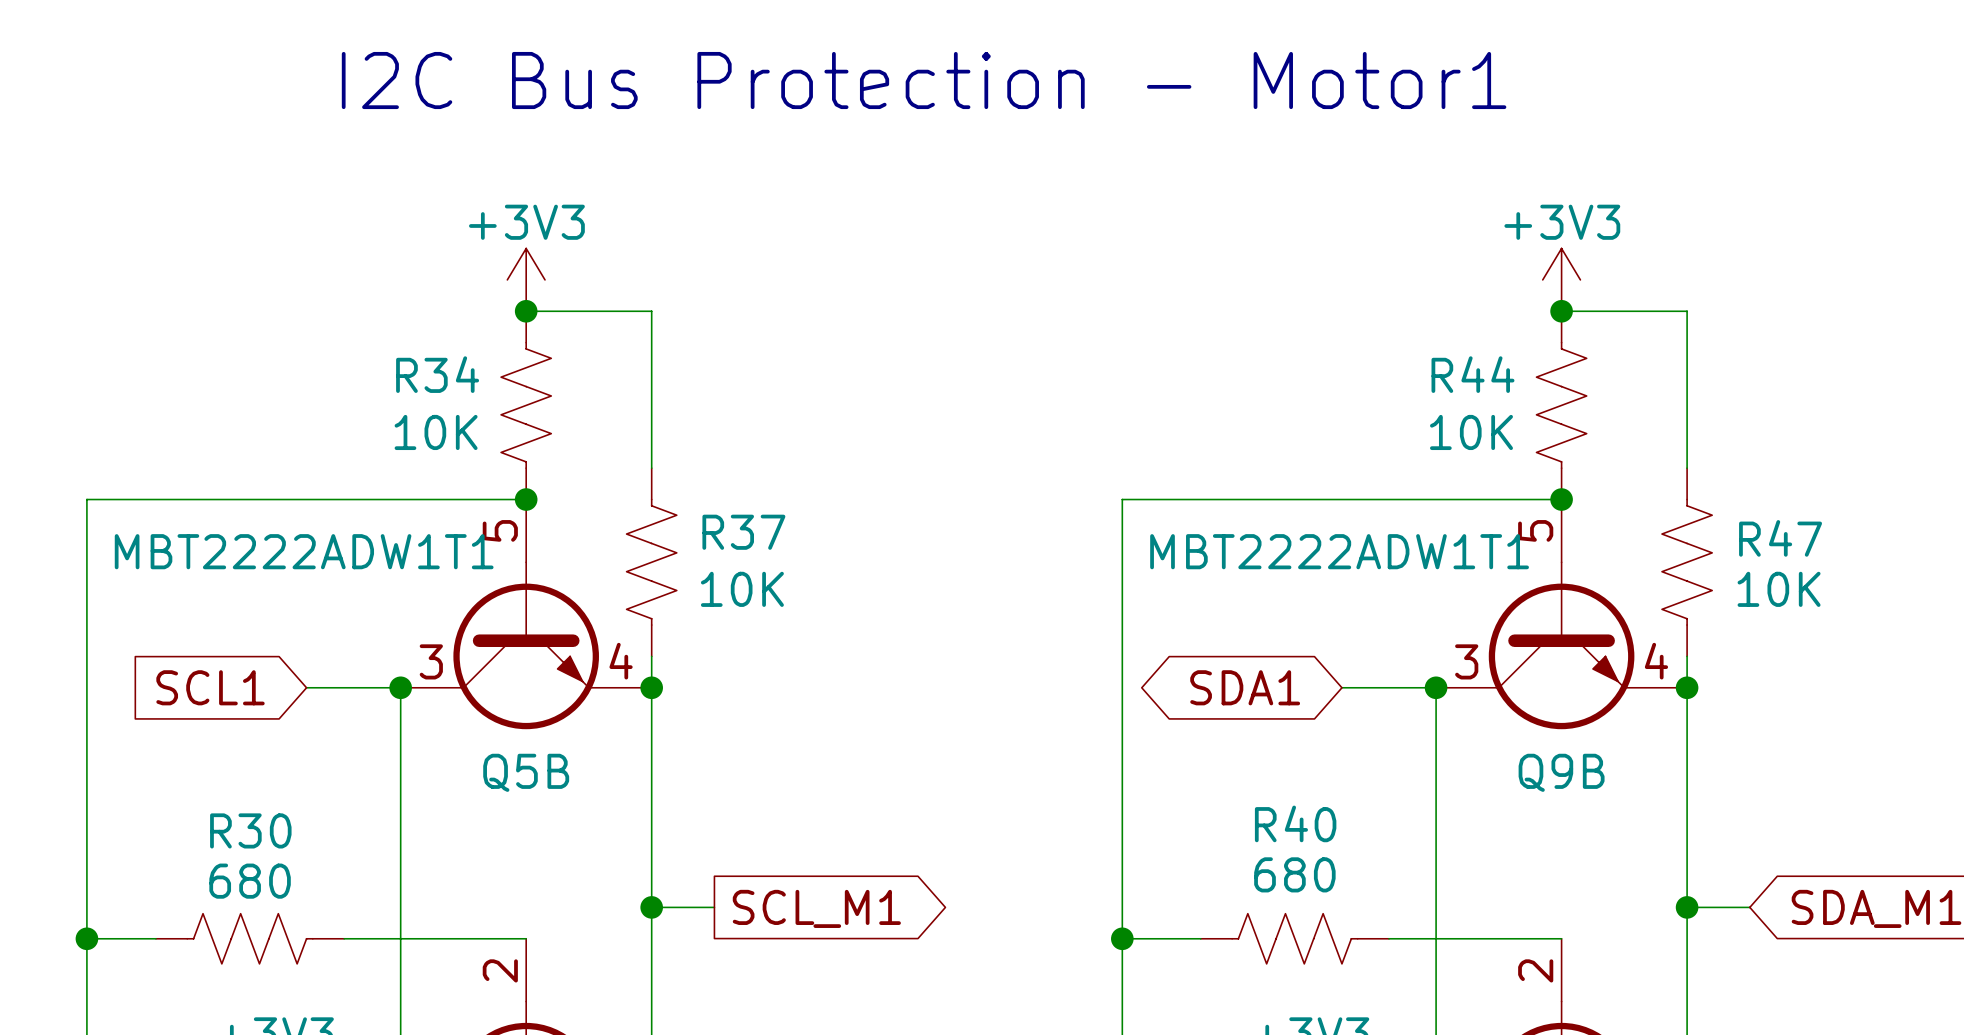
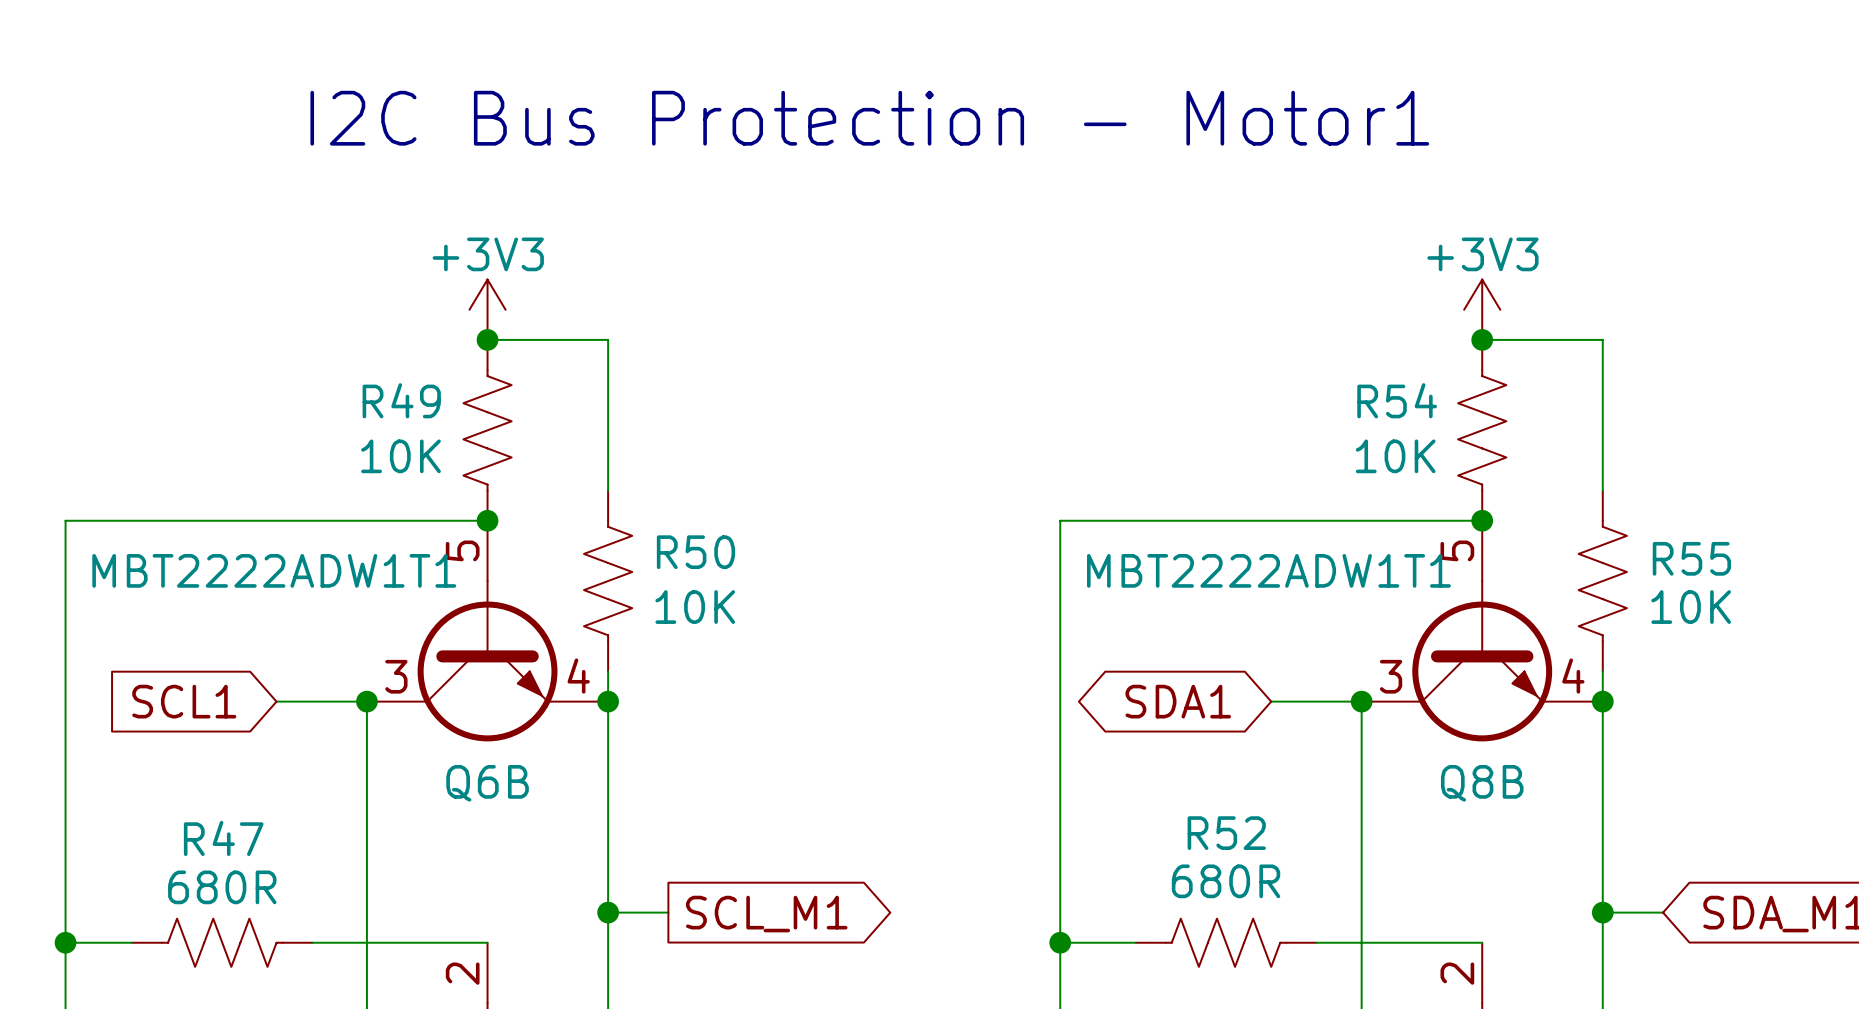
R34 name: R34 (437, 374) -> R49 (401, 400)
R44 name: R44 (1472, 374) -> R54 (1397, 400)
R37 name: R37 (743, 532) -> R50 (695, 552)
R47 name: R47 (1780, 538) -> R55 (1691, 558)
Q5B name: Q5B (526, 772) -> Q6B (487, 783)
Q9B name: Q9B (1561, 772) -> Q8B (1482, 783)
R40 name: R40 (1295, 823) -> R52 (1226, 833)
R30 name: R30 (250, 830) -> R47 (223, 838)
R40 value: 680 (1294, 874) -> 680R (1226, 881)
R30 value: 680 (250, 881) -> 680R (222, 887)

